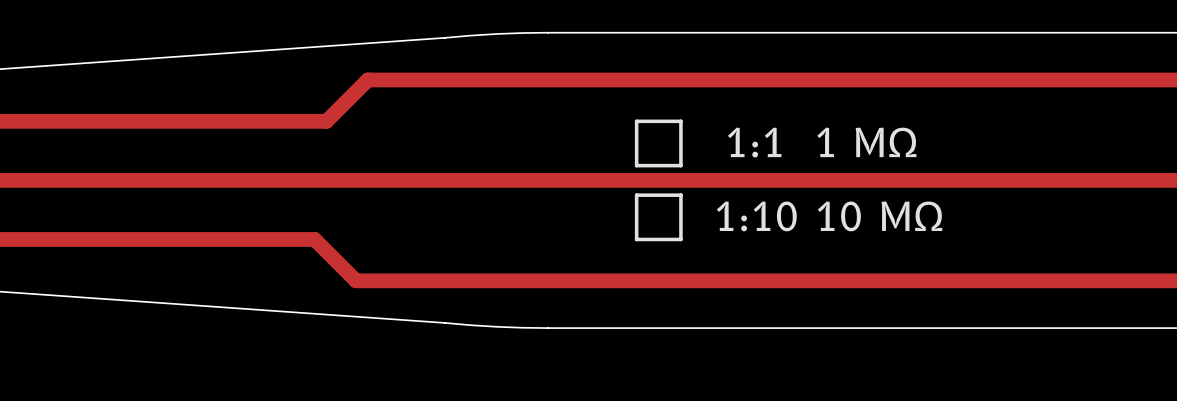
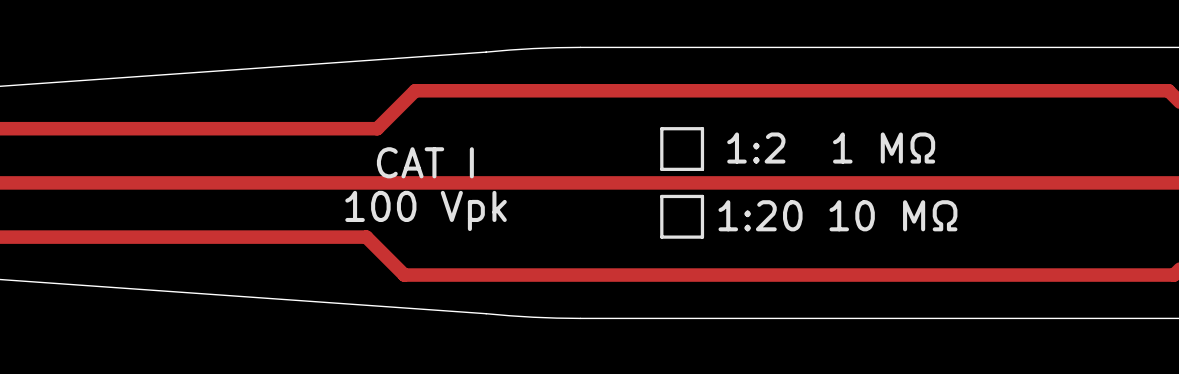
text: 1:1 1 MΩ (822, 142) -> 1:2 1 MΩ (831, 148)
text: none -> CAT I (425, 162)
text: none -> 100 Vpk (426, 210)
text: 1:10 10 MΩ (829, 216) -> 1:20 10 MΩ (837, 215)

